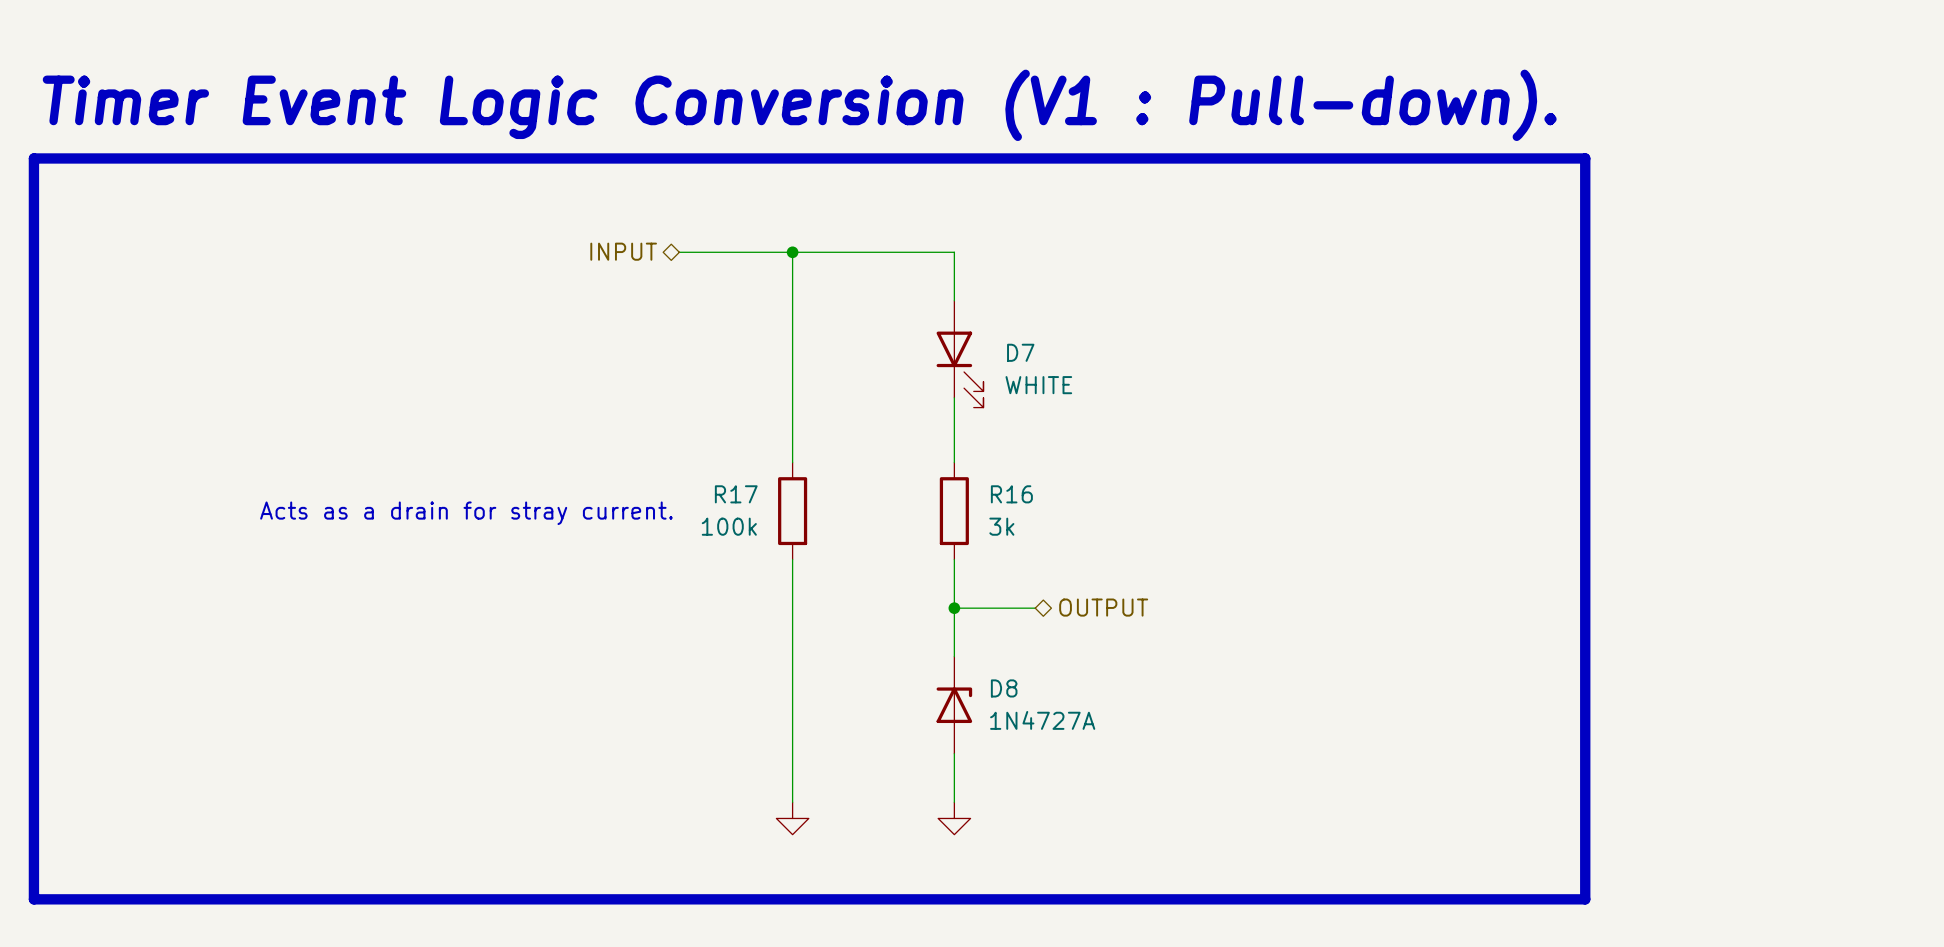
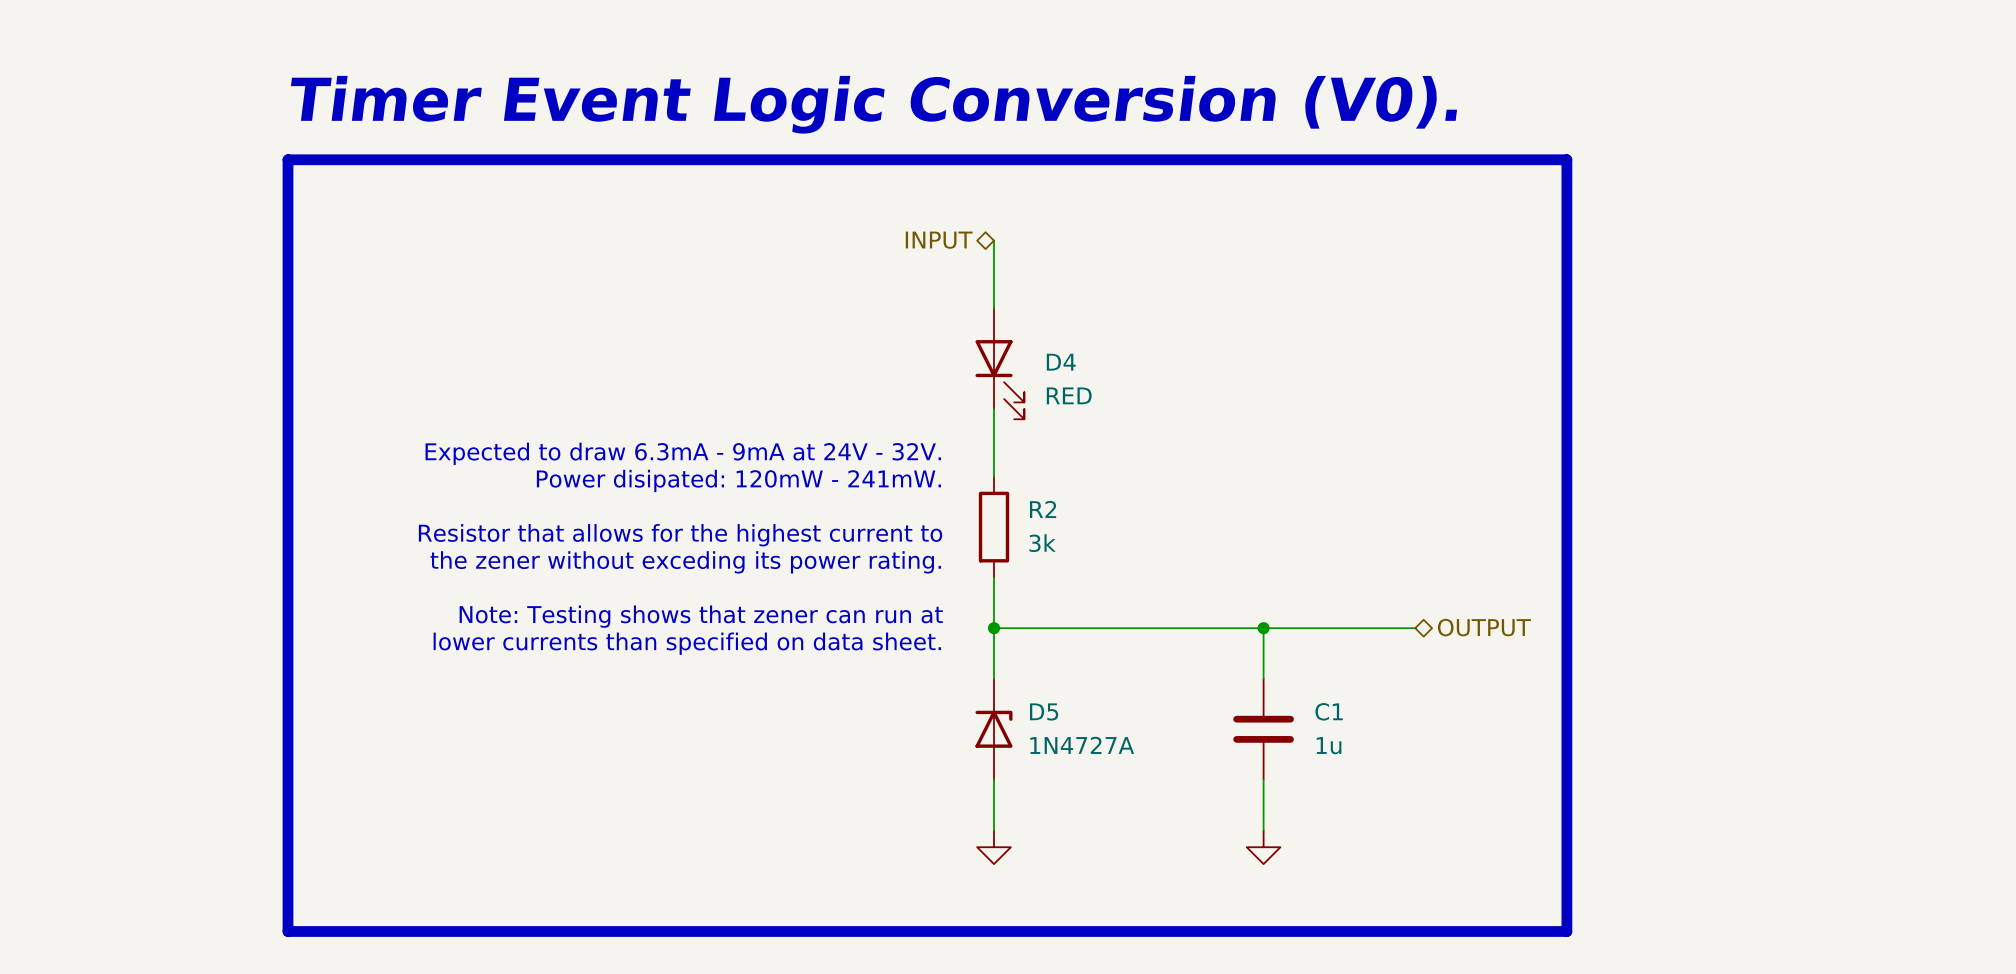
text: Timer Event Logic Conversion (V1 : Pull-down). (799, 105) -> Timer Event Logic Conversion (V0). (874, 104)
line: (276, 158) (33, 158) (33, 899) (276, 899) -> (288, 159) (288, 931)
line: (1504, 158) (1585, 158) (1585, 899) (1504, 899) -> (1566, 159) (1566, 931)
hierarchical label position: INPUT (623, 251) -> INPUT (939, 240)
wire: (679, 252) (954, 252) -> (994, 240) (994, 257)
wire: (792, 252) (792, 462) -> none
junction: (792, 252) -> none
D7 name: D7 (1020, 352) -> D4 (1061, 362)
D7 value: WHITE (1038, 385) -> RED (1069, 395)
text: none -> Expected to draw 6.3mA - 9mA at 24V - 32V. (683, 453)
text: none -> Power disipated: 120mW - 241mW. (738, 480)
R16 name: R16 (1011, 494) -> R2 (1043, 509)
R17: 100k (792, 511) -> none
text: Acts as a drain for stray current. (466, 513) -> none
text: none -> Resistor that allows for the highest current to (680, 535)
text: none -> the zener without exceding its power rating. (685, 562)
wire: (792, 559) (792, 802) -> none
text: none -> Note: Testing shows that zener can run at (701, 616)
hierarchical label: OUTPUT (1103, 607) -> none
hierarchical label: none -> OUTPUT (1484, 627)
wire: none -> (1078, 628) (1415, 628)
wire: none -> (1263, 628) (1263, 678)
junction: none -> (1263, 628)
text: none -> lower currents than specified on data sheet. (687, 643)
D8 name: D8 (1004, 688) -> D5 (1044, 711)
C1: none -> 1u (1263, 729)
wire: none -> (1263, 779) (1263, 830)
power symbol: (792, 818) -> none
power symbol: none -> (1263, 847)

